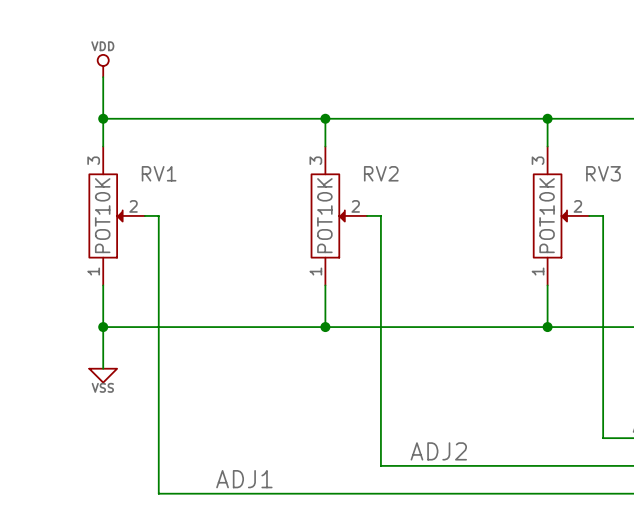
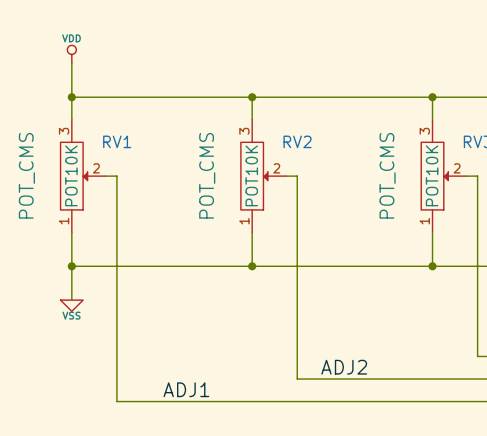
RV1 text: none -> POT_CMS (26, 175)
RV2 text: none -> POT_CMS (207, 175)
RV3 text: none -> POT_CMS (387, 175)

